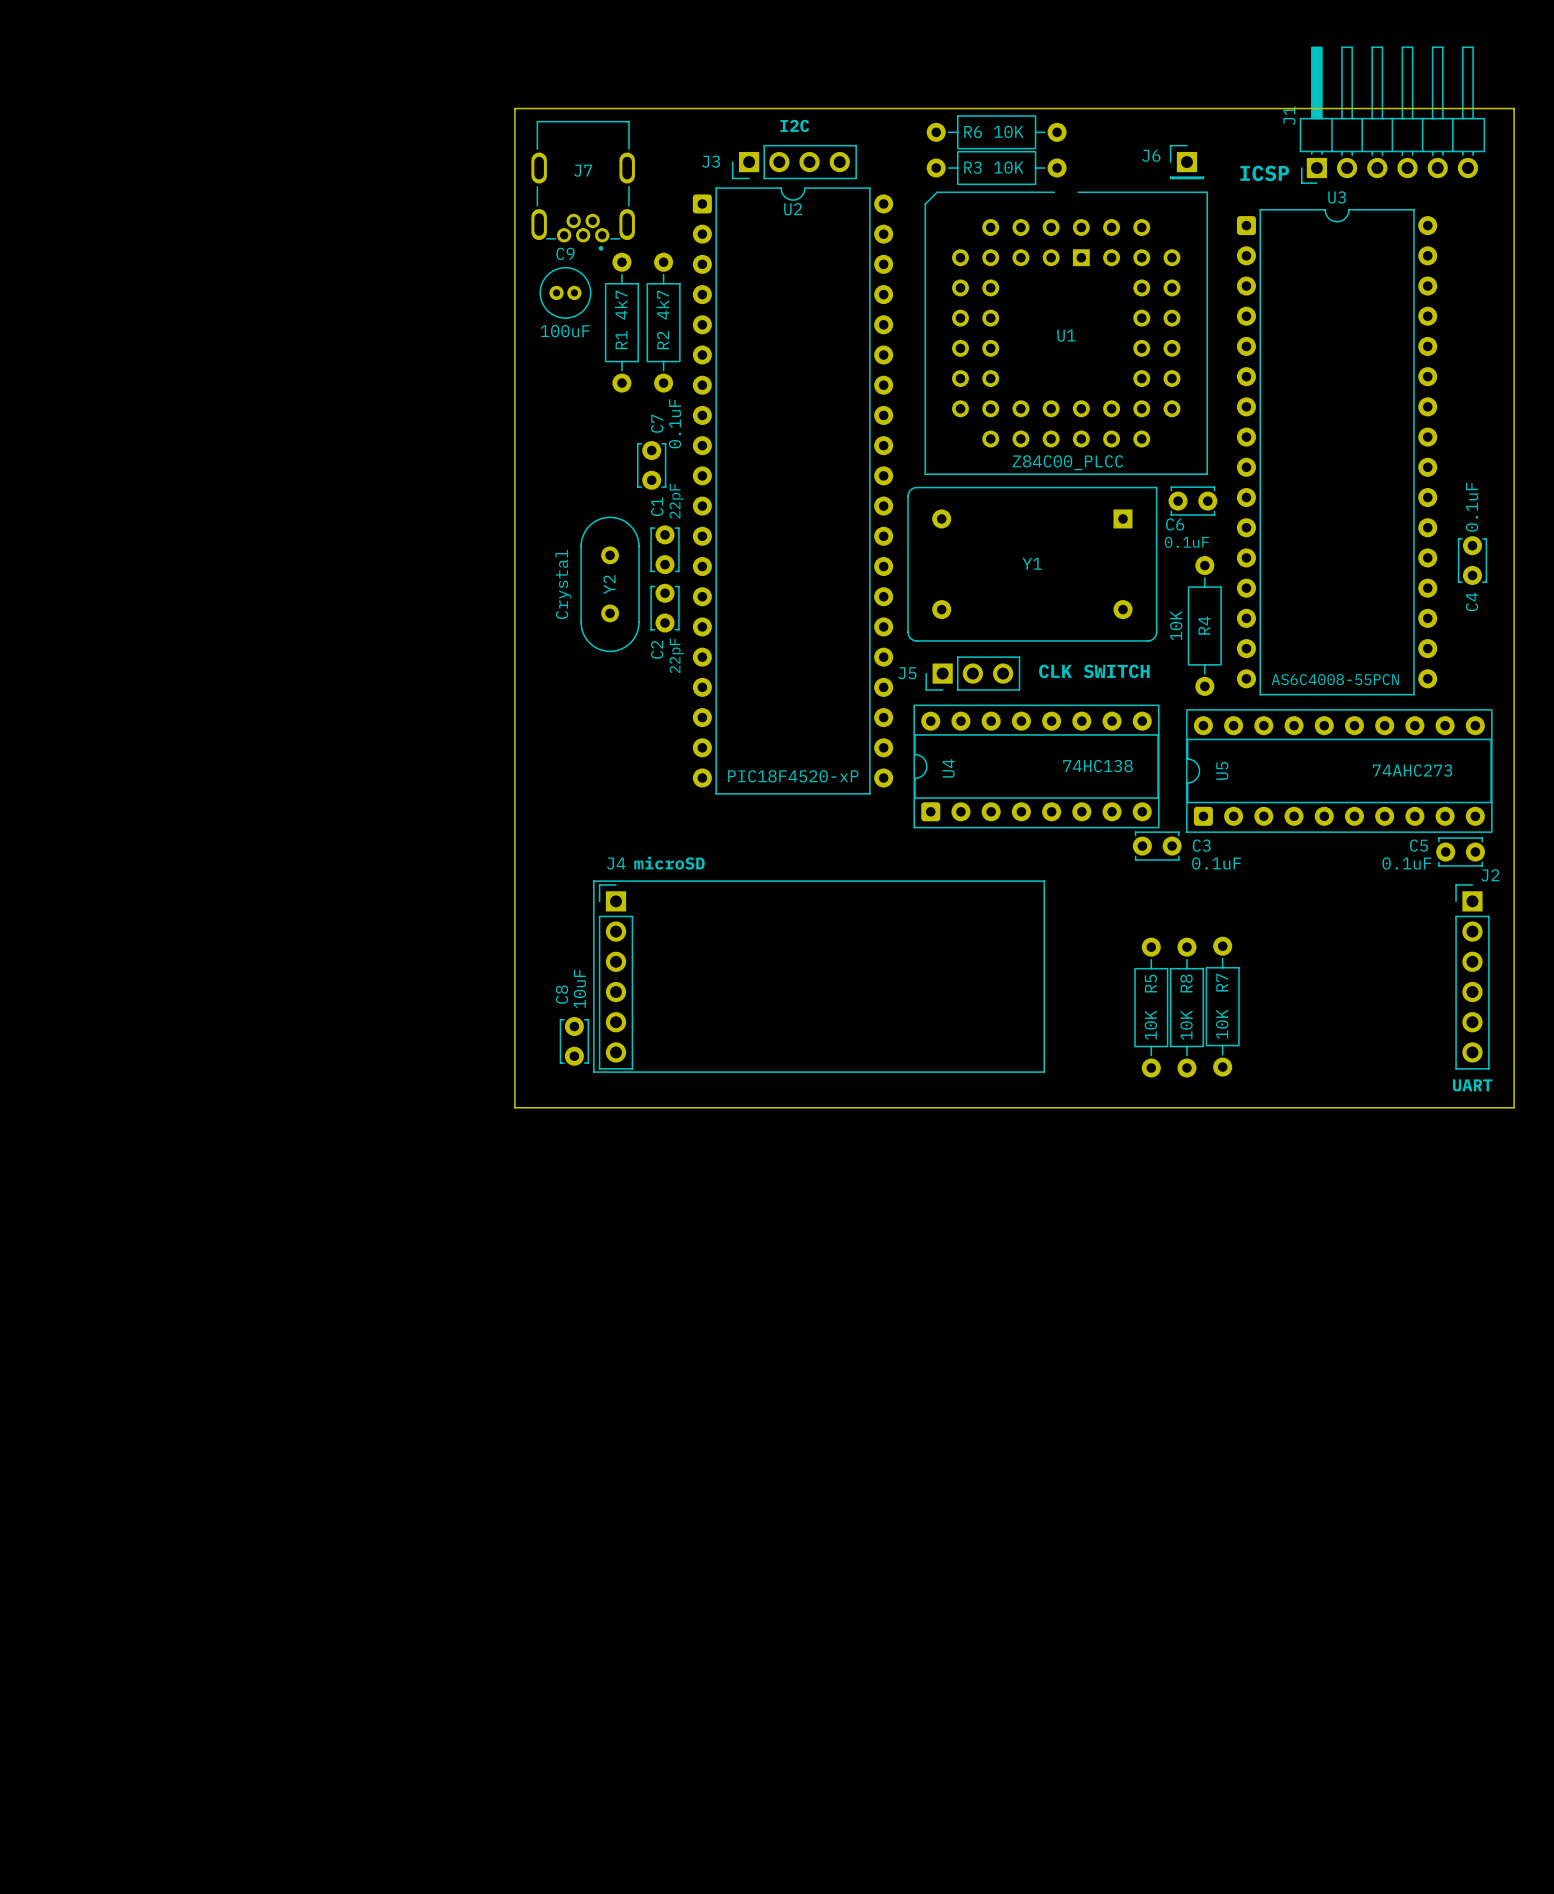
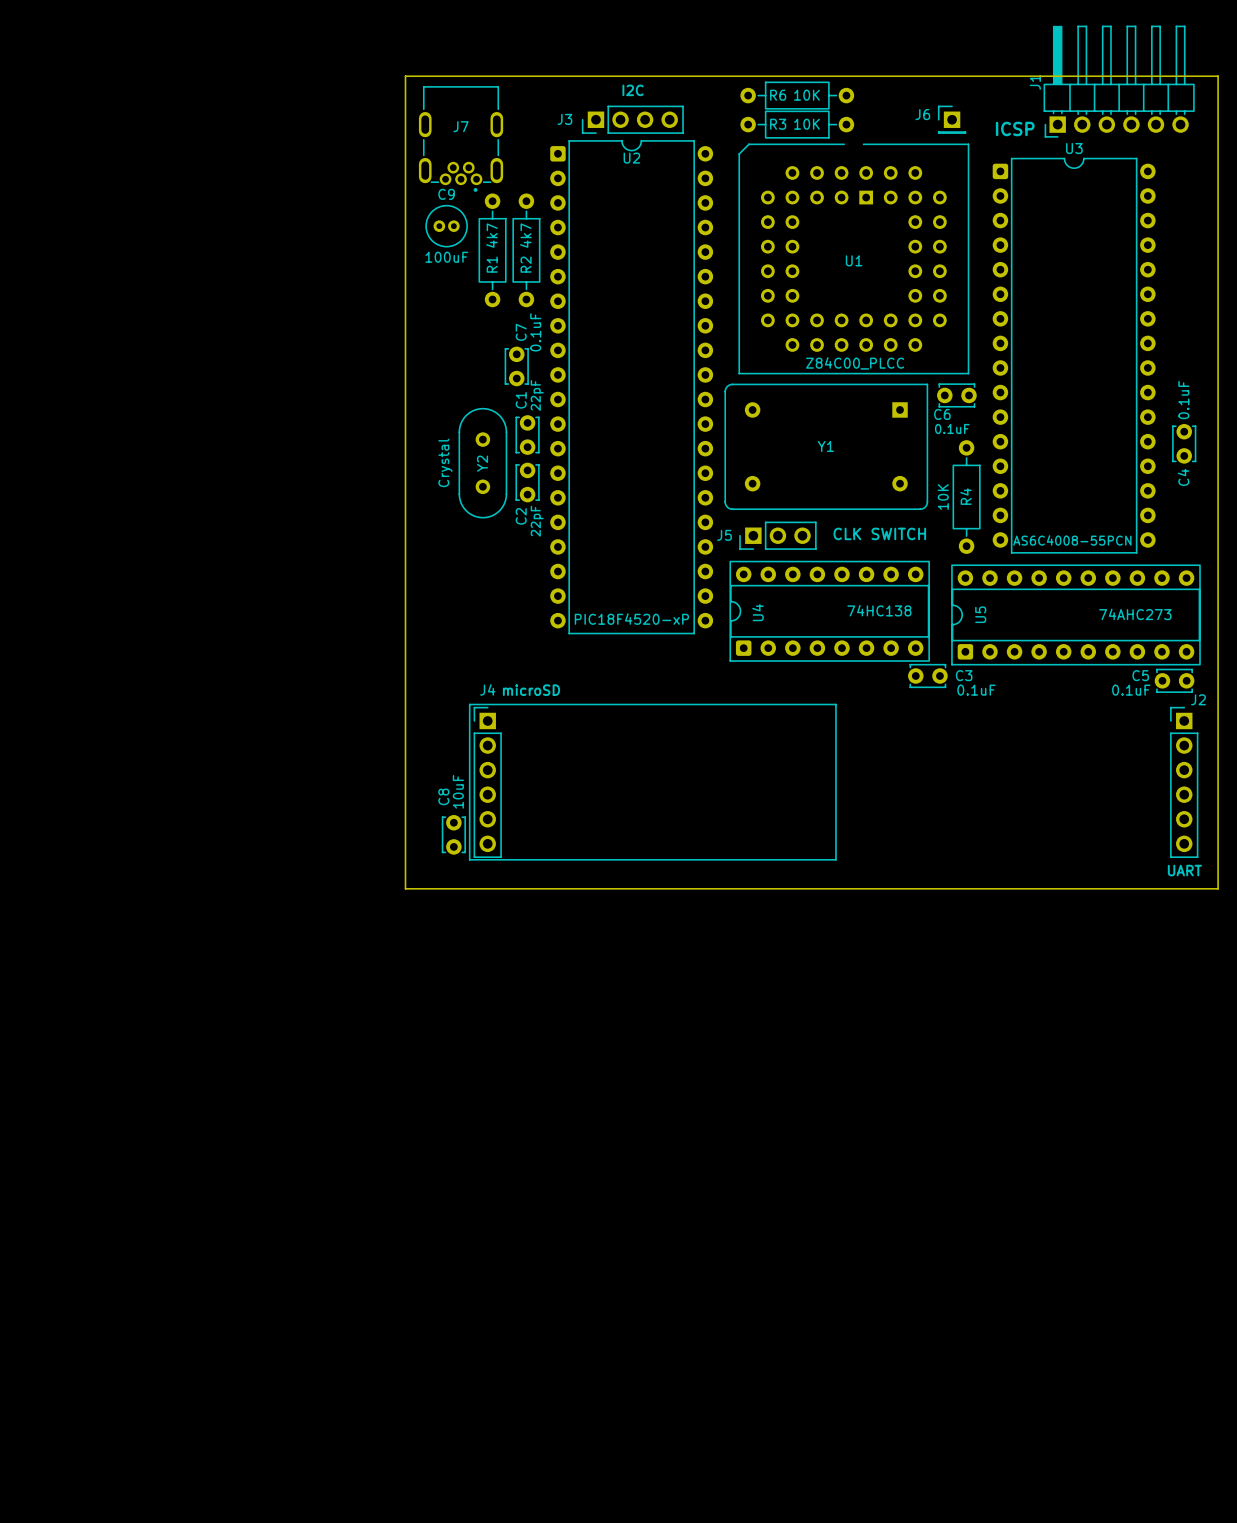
R7: 10K (1222, 1006) -> none
R5: 10K (1151, 1007) -> none
R8: 10K (1186, 1007) -> none

